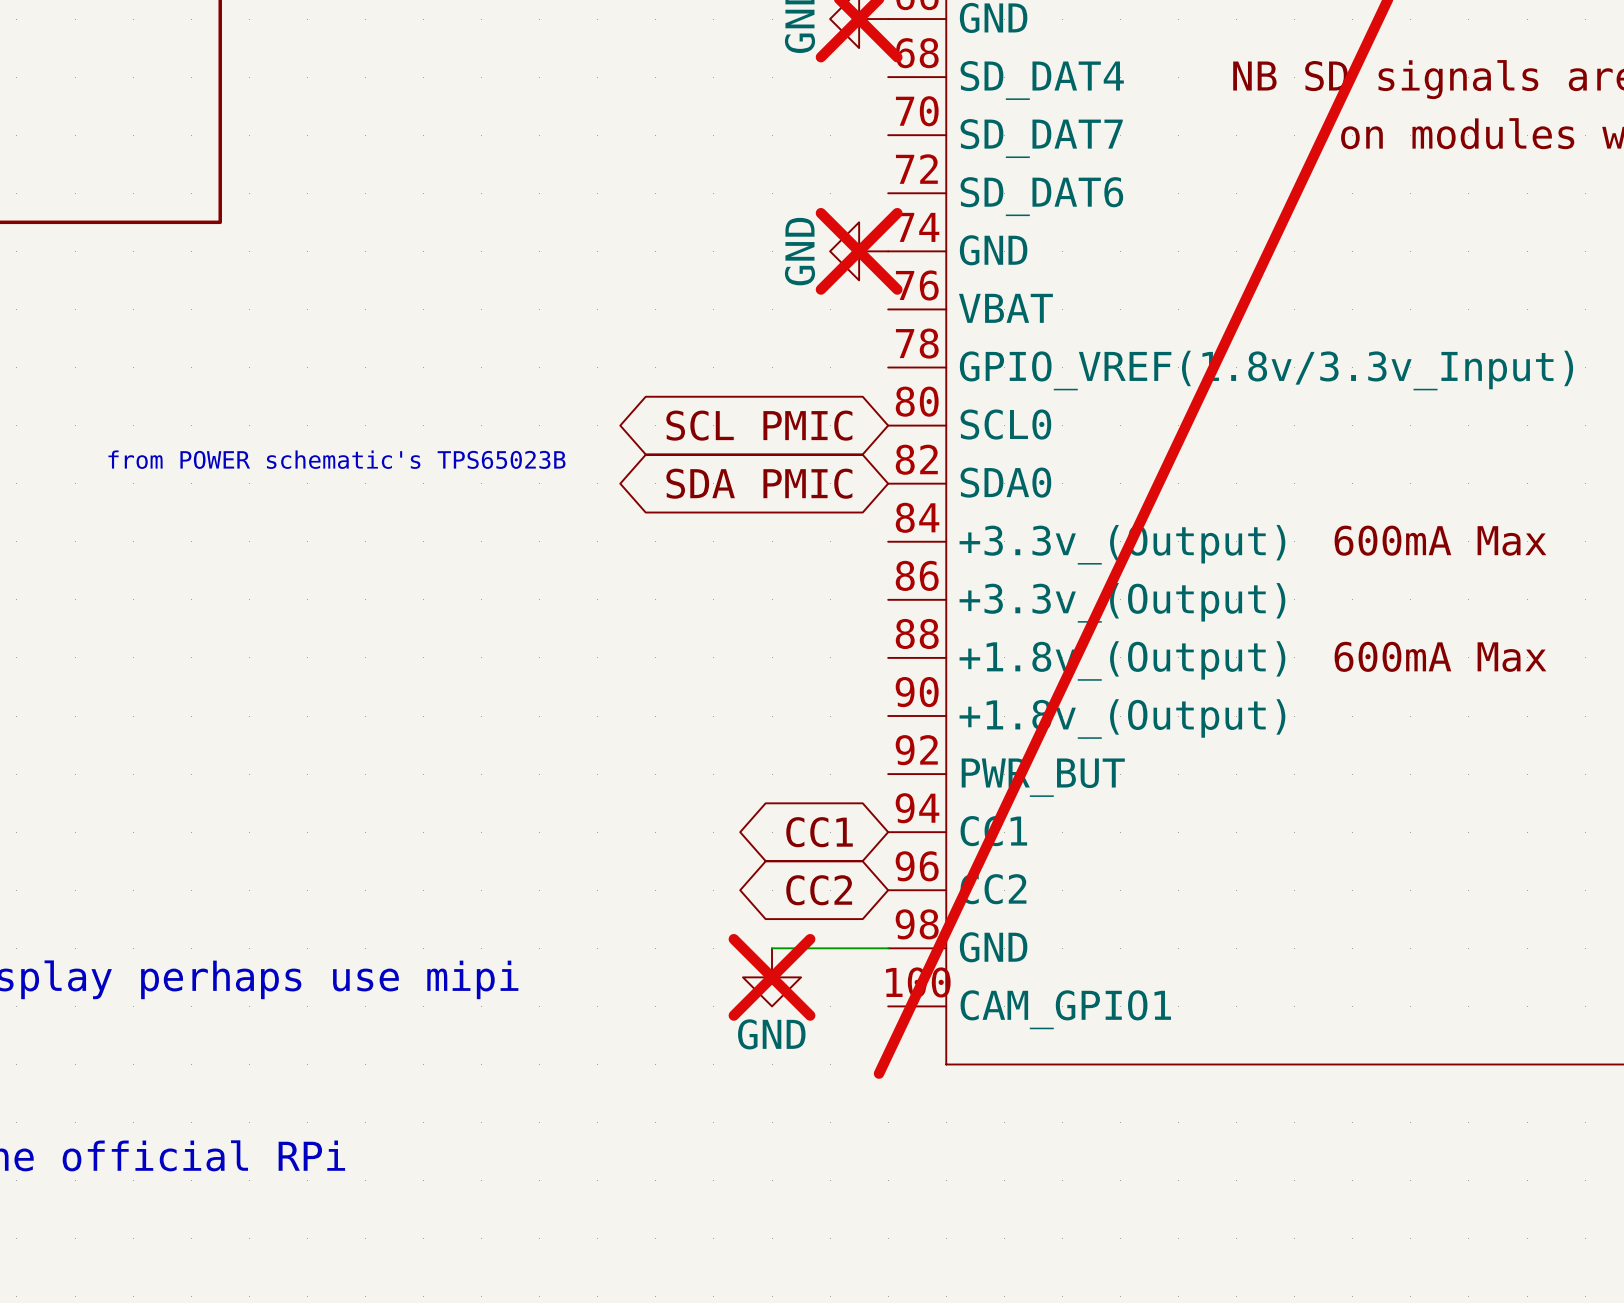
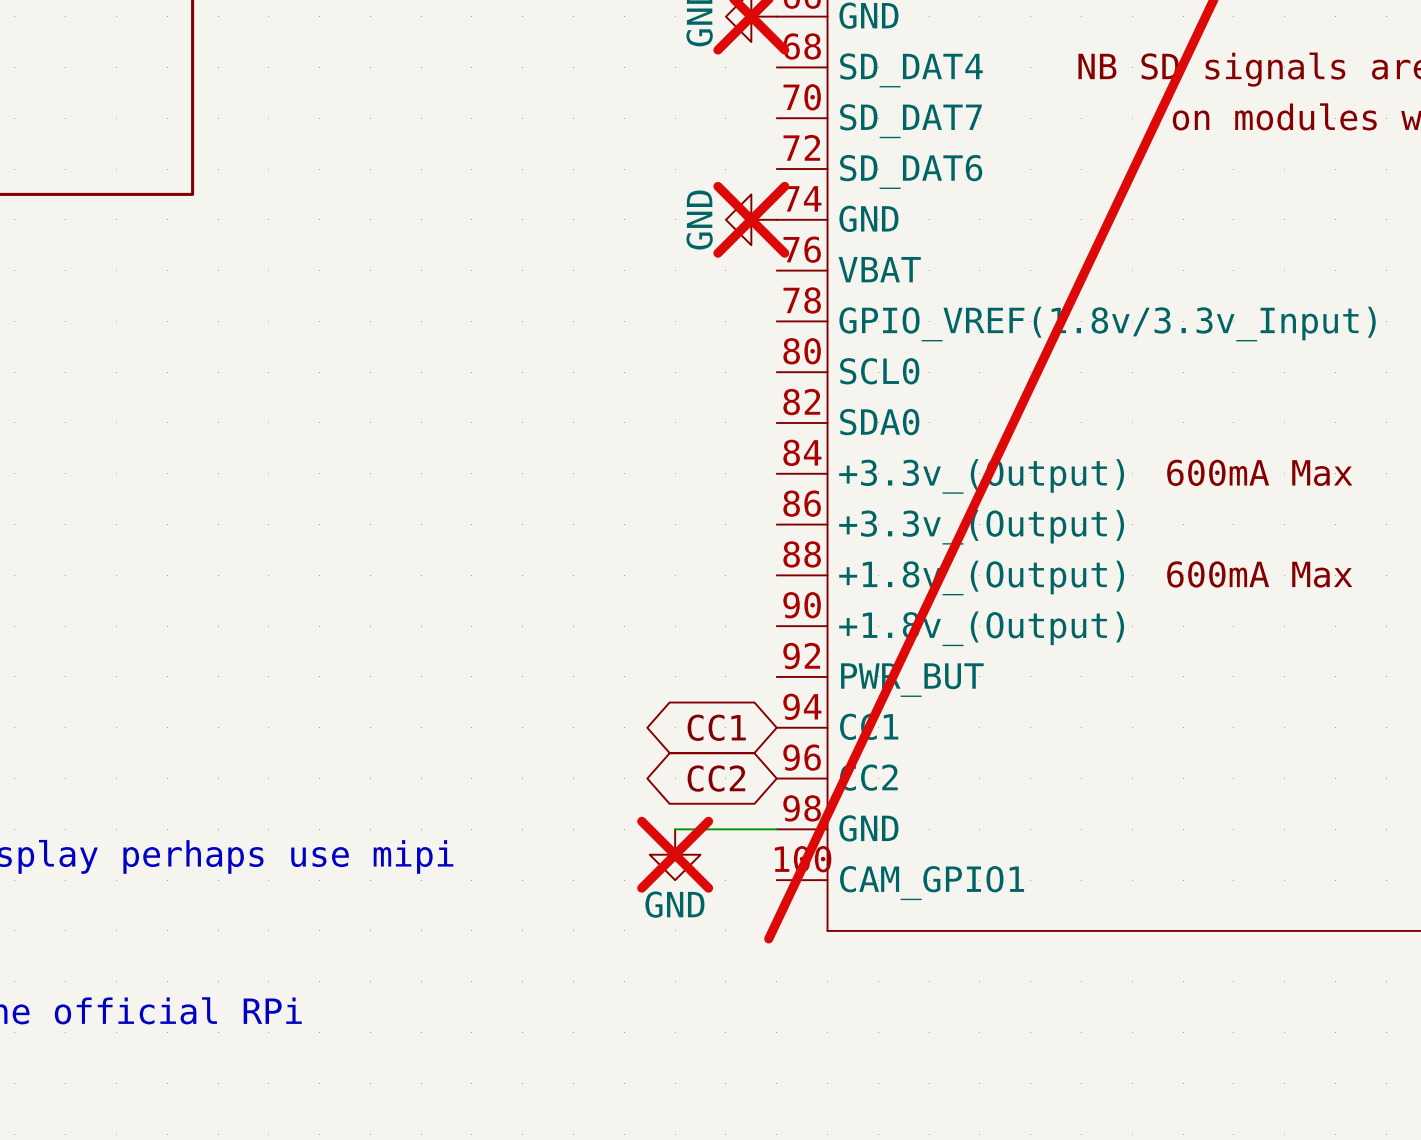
global label: SCL PMIC (759, 425) -> none
text: from POWER schematic's TPS65023B (336, 459) -> none
global label: SDA PMIC (759, 483) -> none

